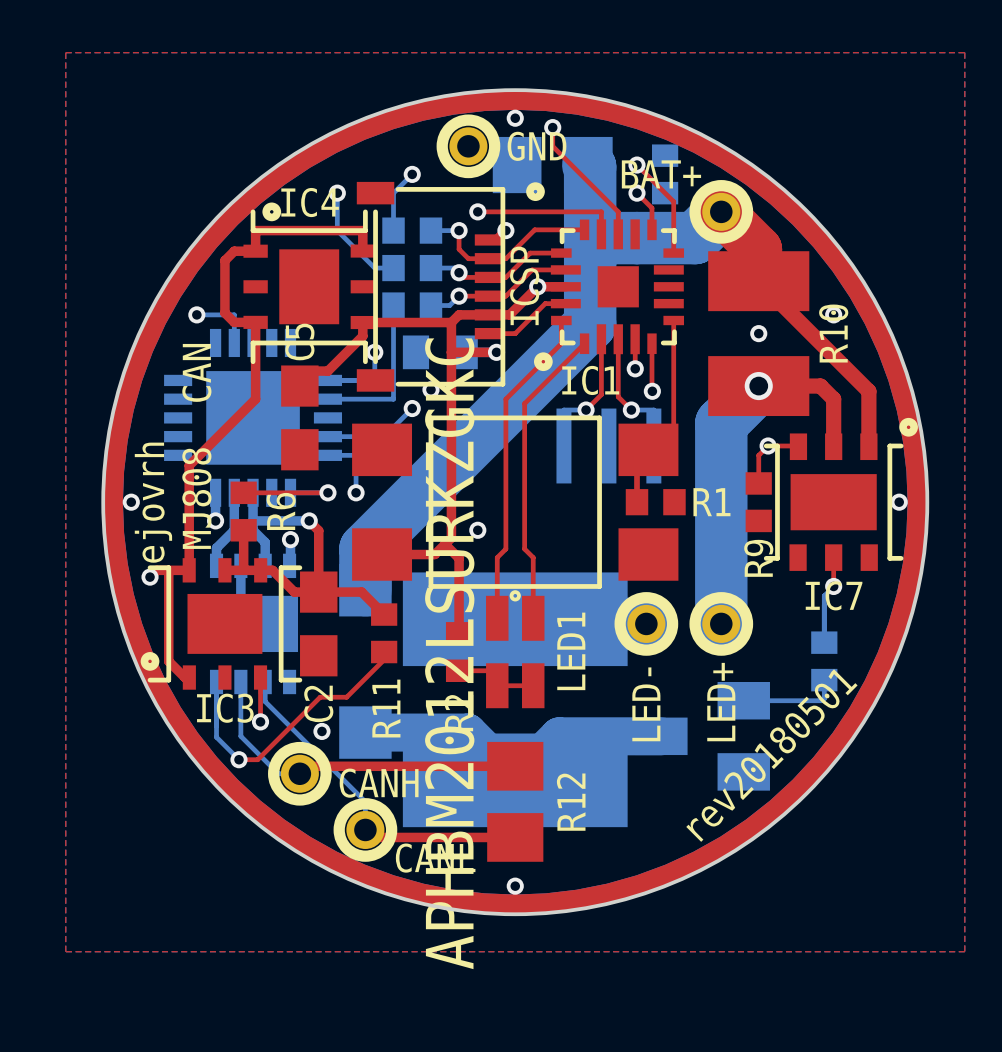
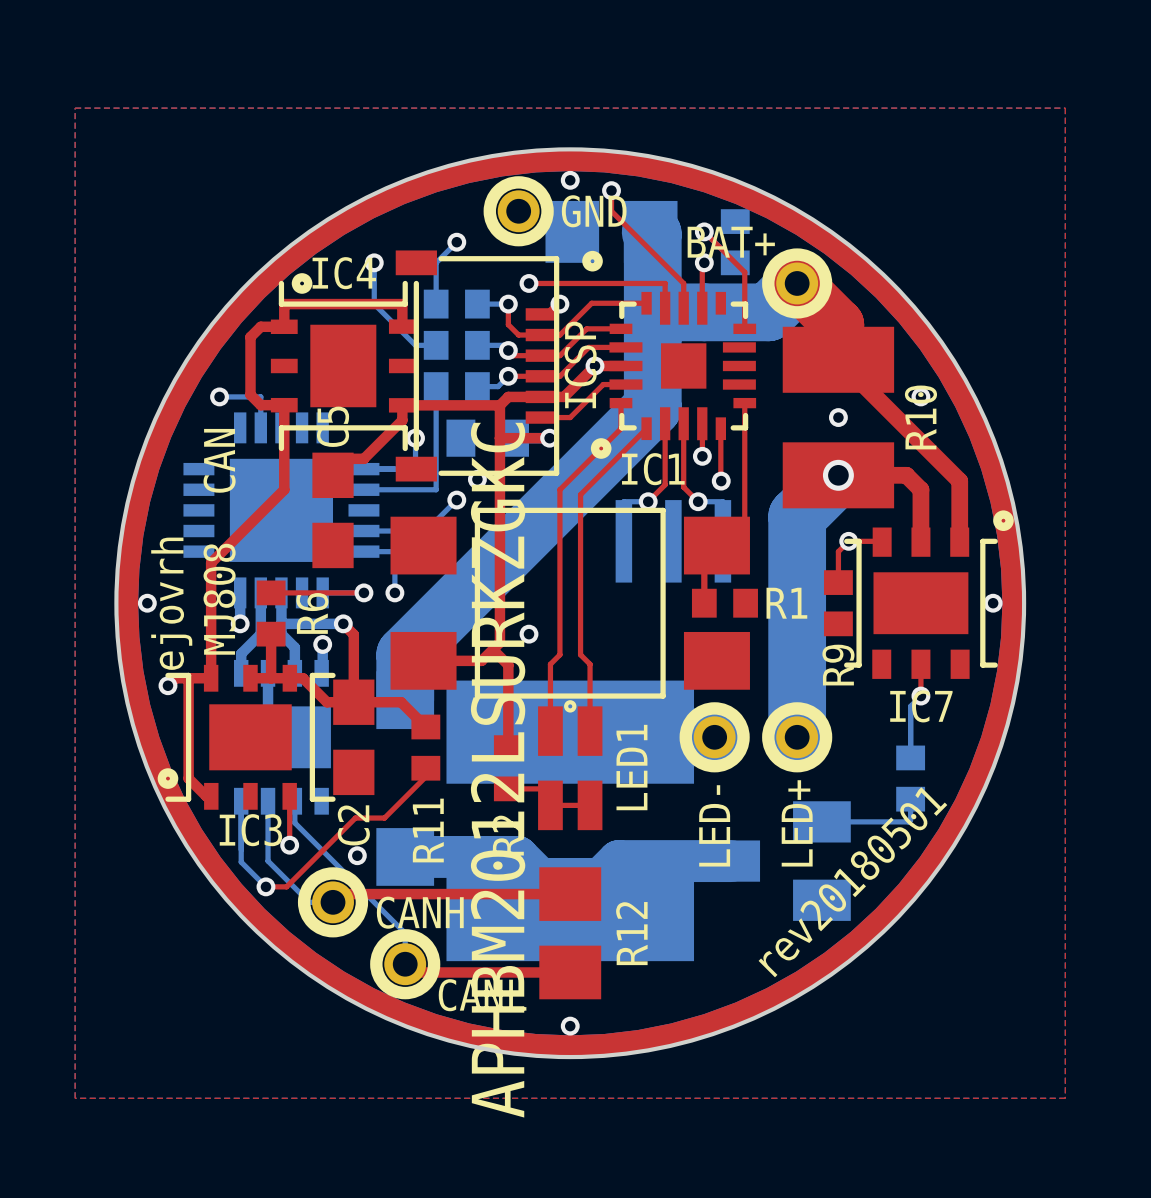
top track: (637, 193) (651, 208) (651, 229) -> (704, 262) (702, 264) (702, 308)

